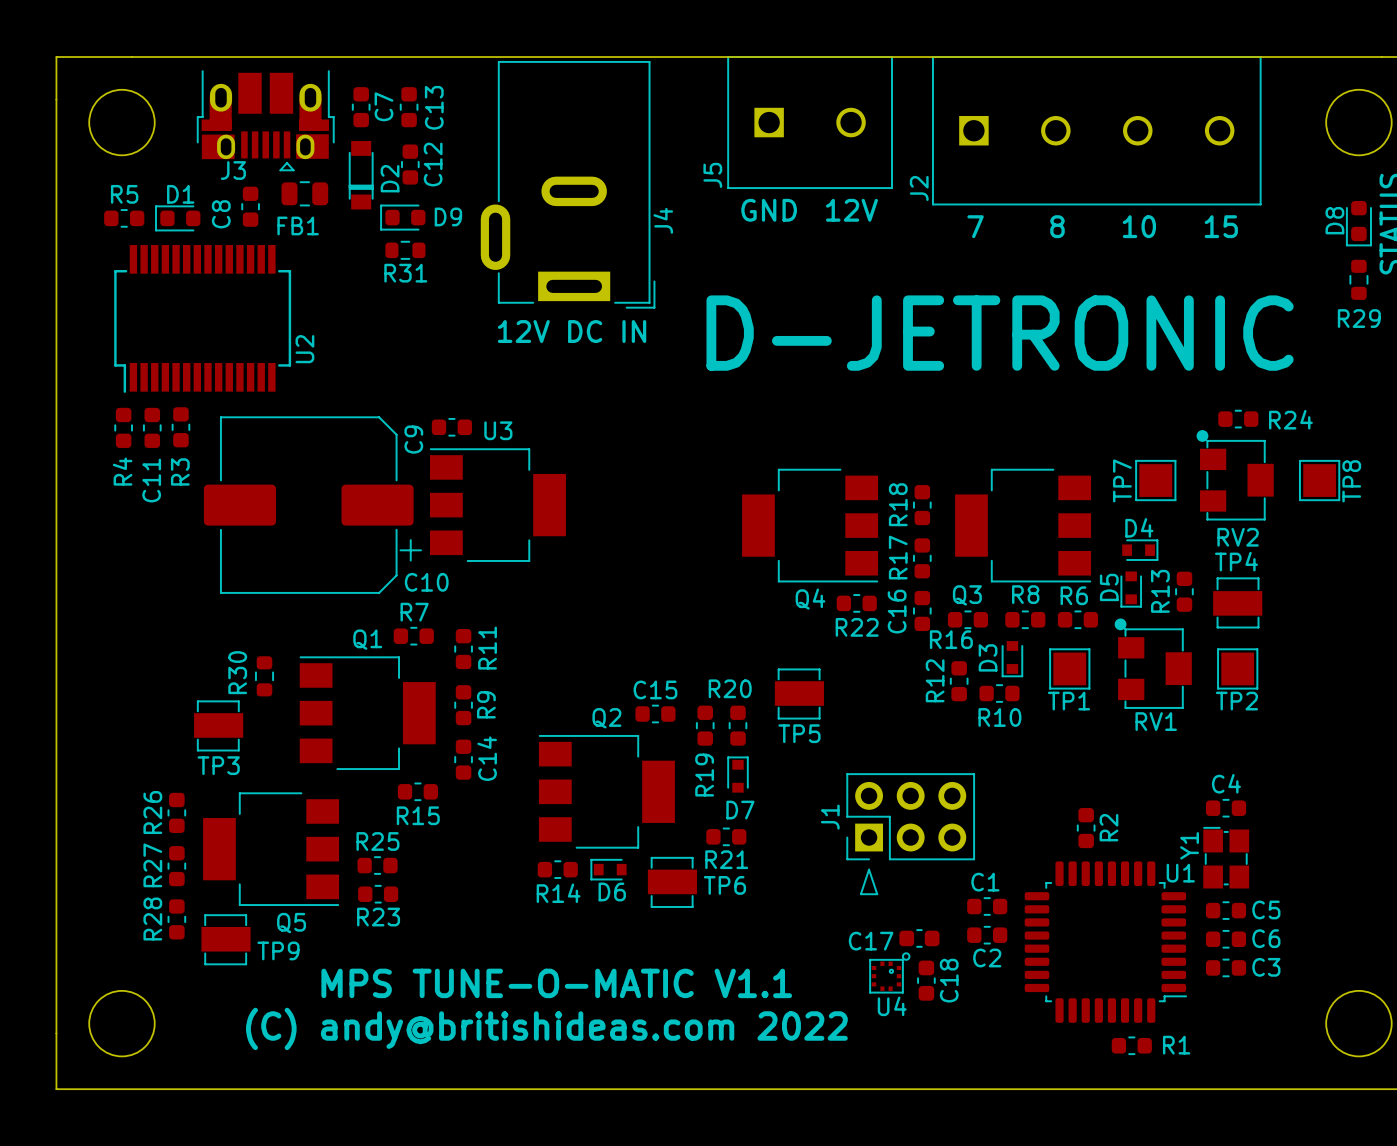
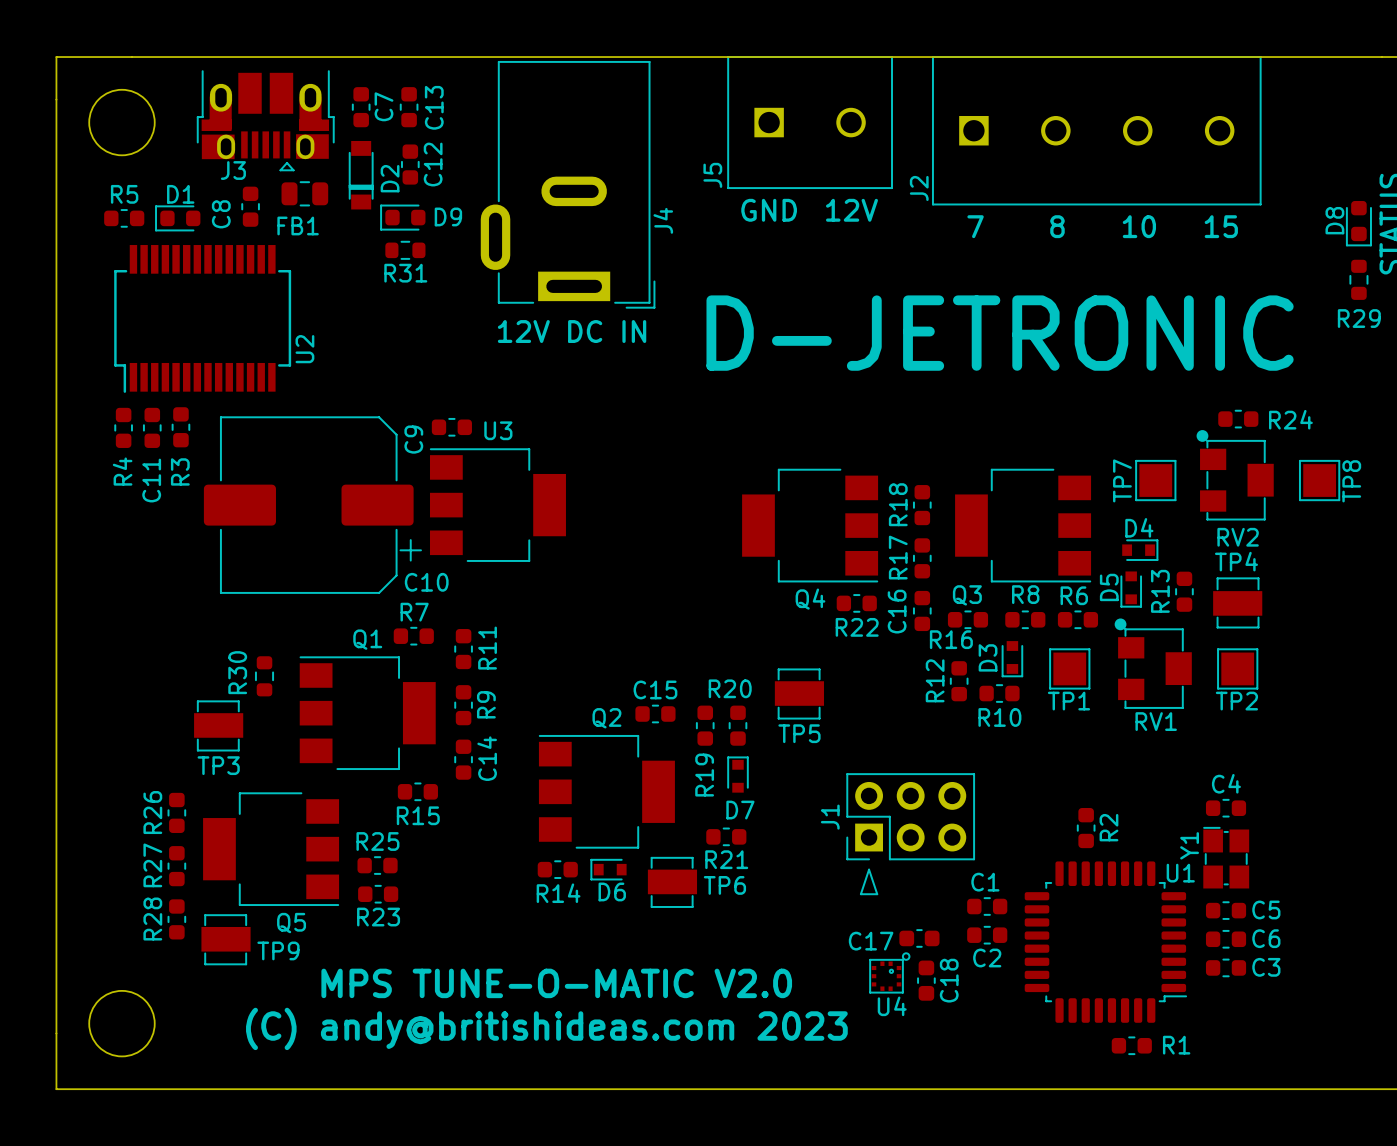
round board edge: [1325, 89, 1393, 156] -> none
text: MPS TUNE-O-MATIC V1.1 (556, 983) -> MPS TUNE-O-MATIC V2.0 (556, 983)
round board edge: [1325, 990, 1393, 1057] -> none
text: (C) andy@britishideas.com 2022 (546, 1028) -> (C) andy@britishideas.com 2023 (546, 1028)

